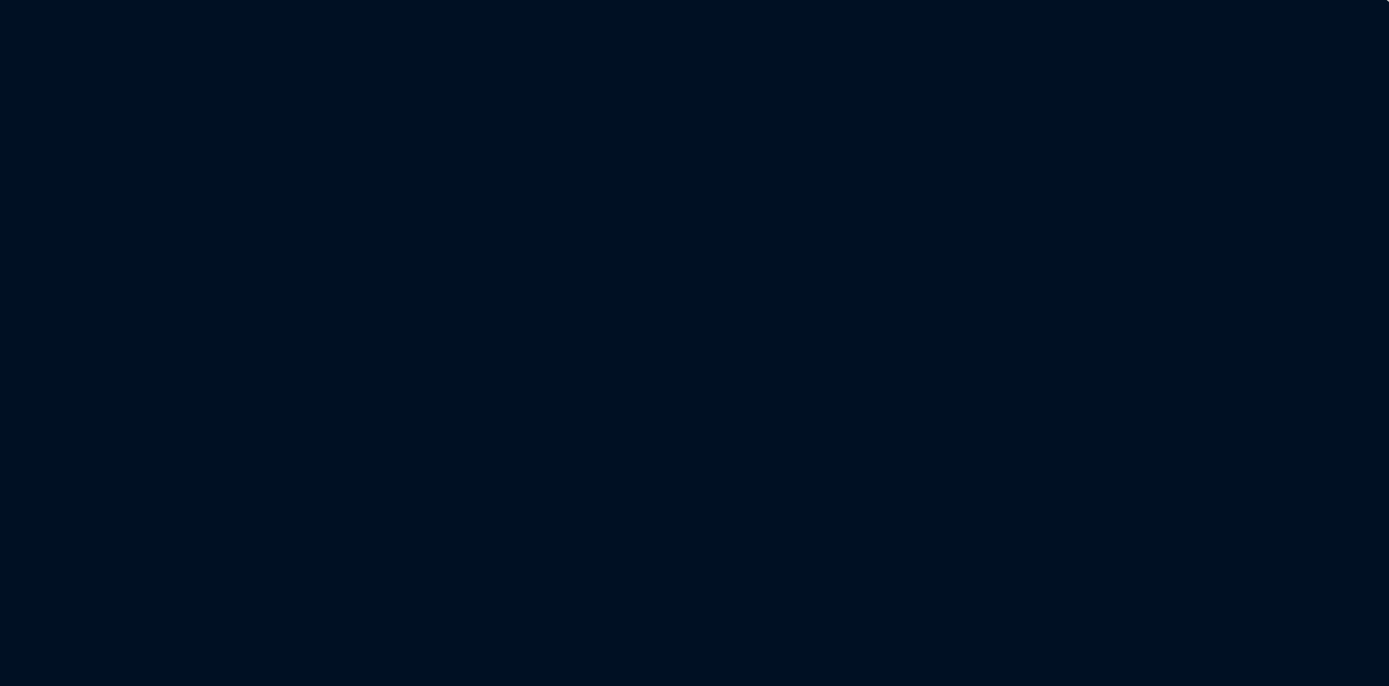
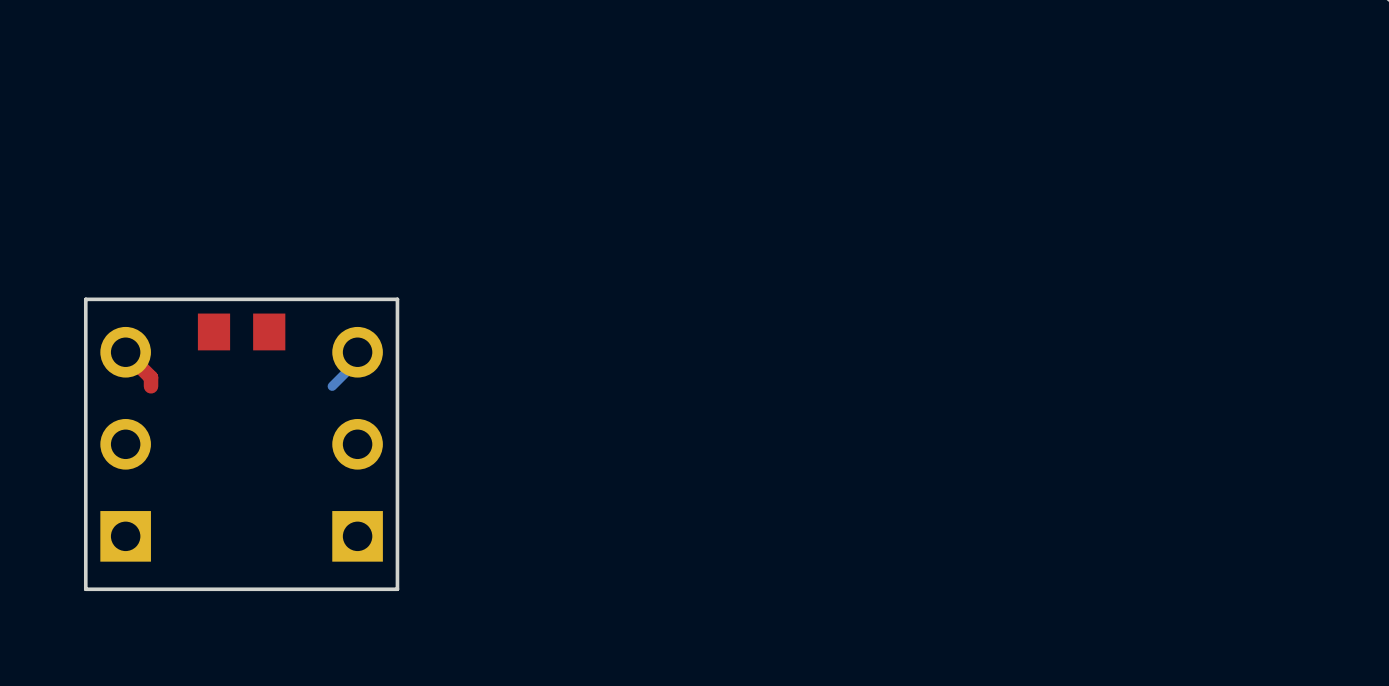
board edge: none -> (397, 299) (397, 589) (85, 589) (85, 299) (397, 299)
part: none -> (241, 331)
top track: none -> (125, 352) (151, 377) (151, 386)
bottom track: none -> (357, 352) (357, 360) (332, 386)
part: none -> (125, 444)
part: none -> (357, 444)

